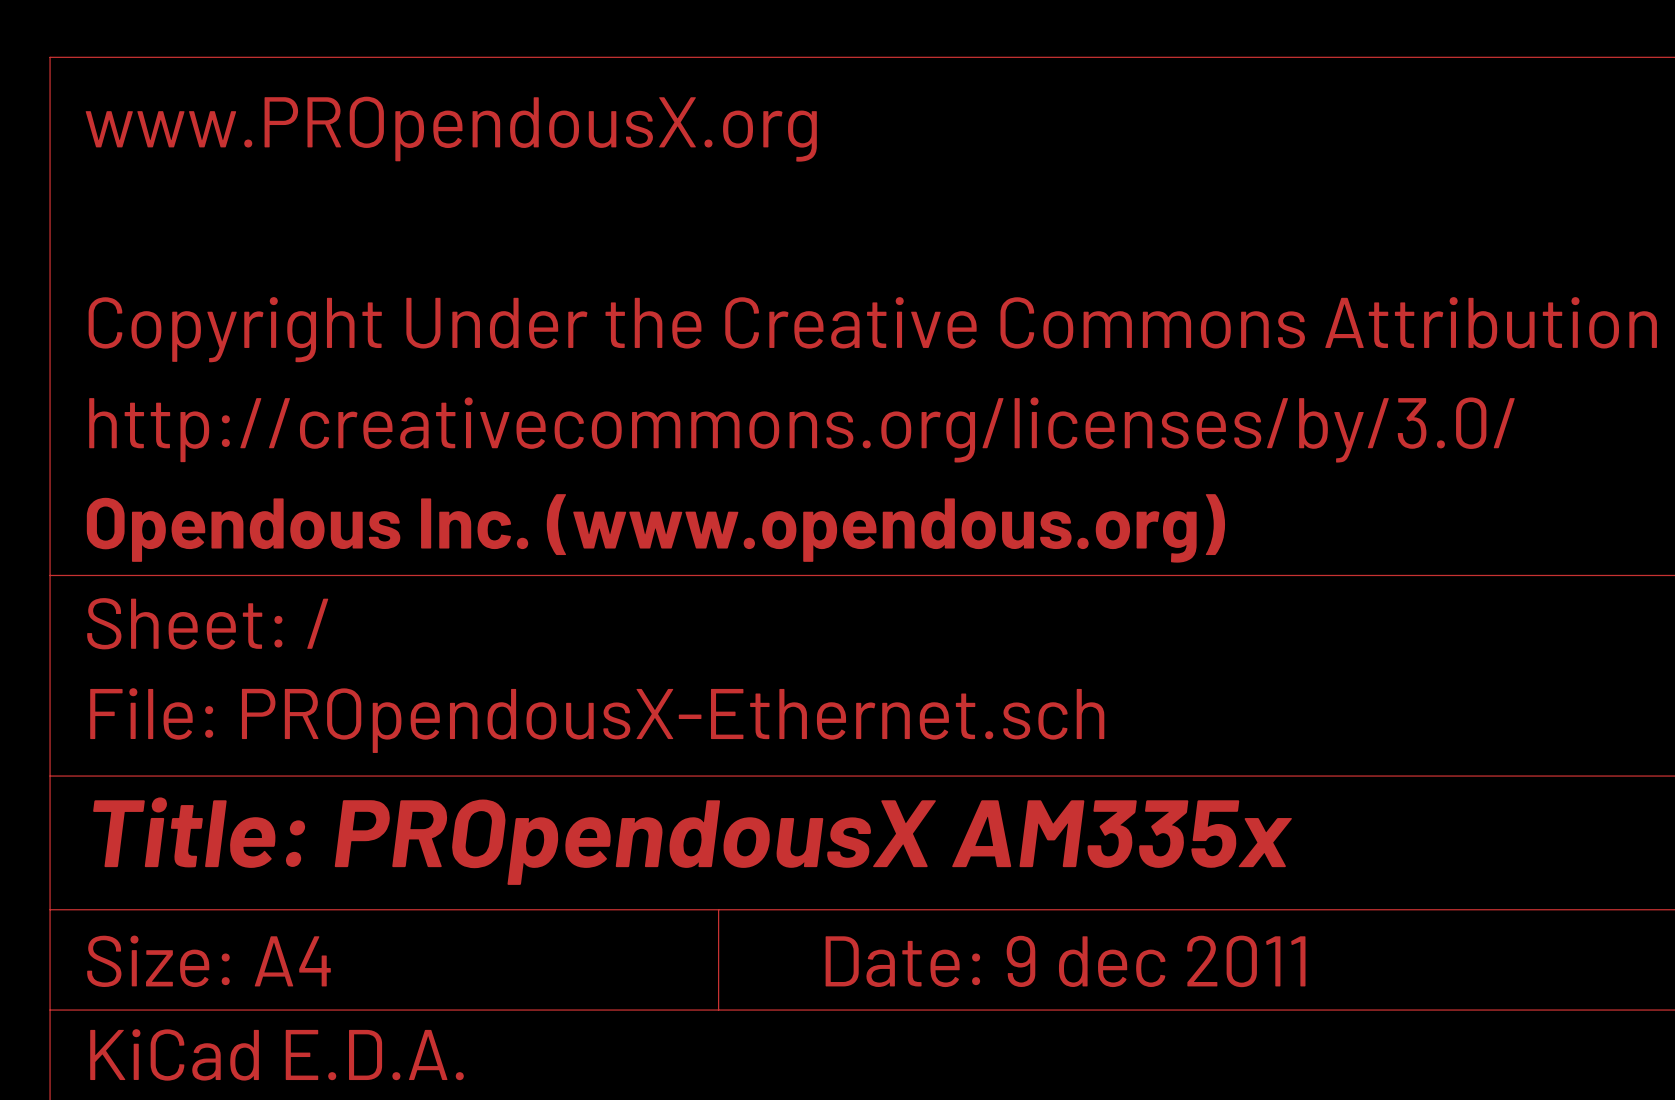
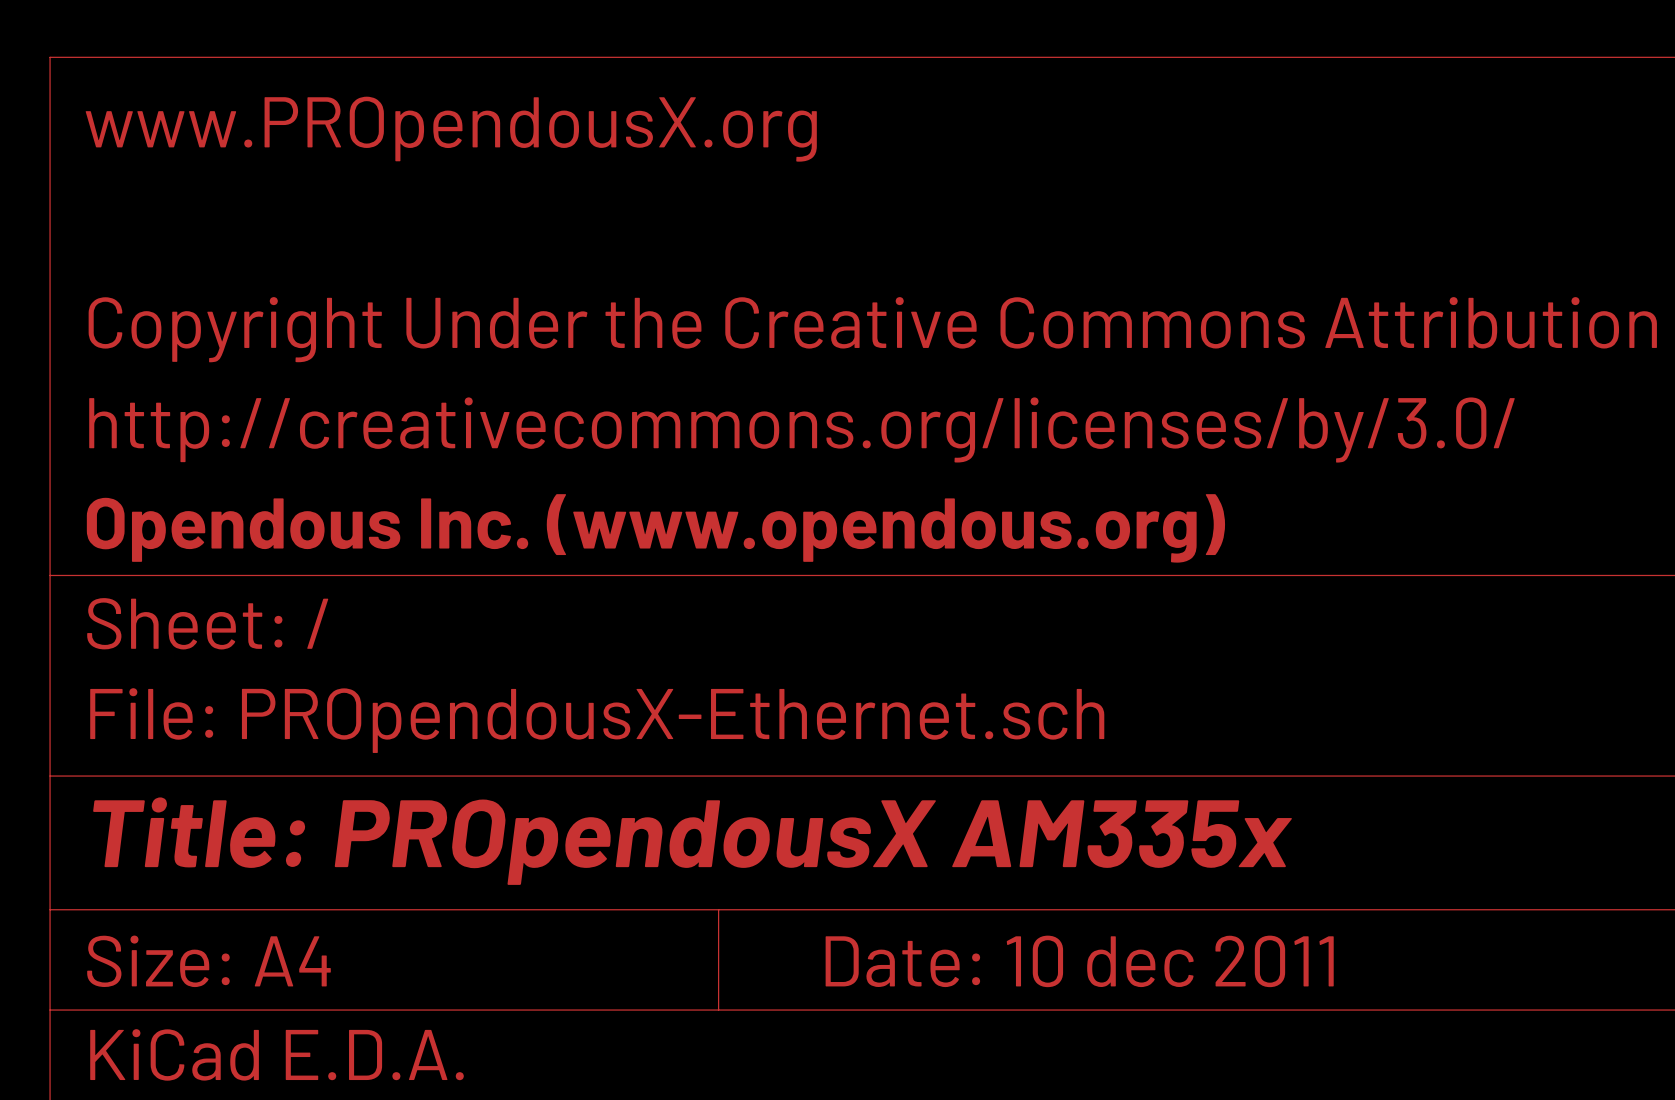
title block: Date: 9 dec 2011 (1065, 961) -> Date: 10 dec 2011 (1079, 961)

